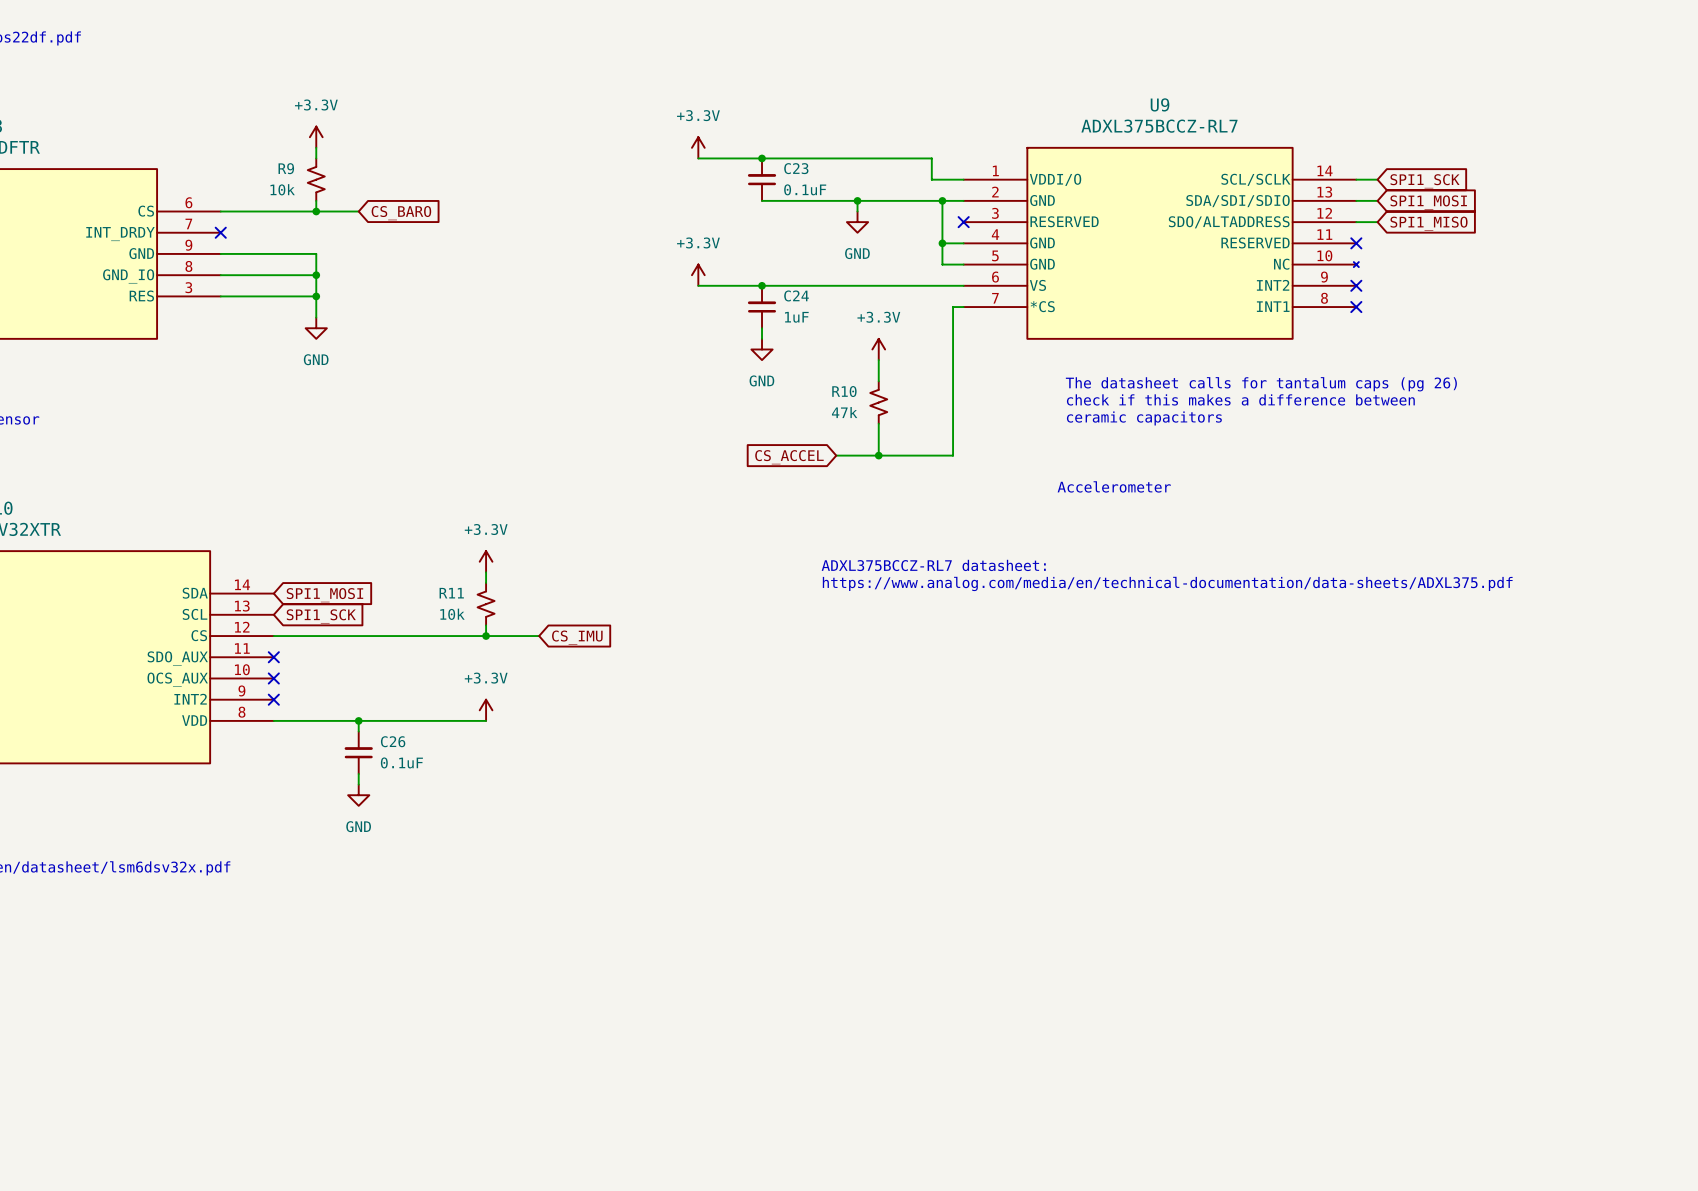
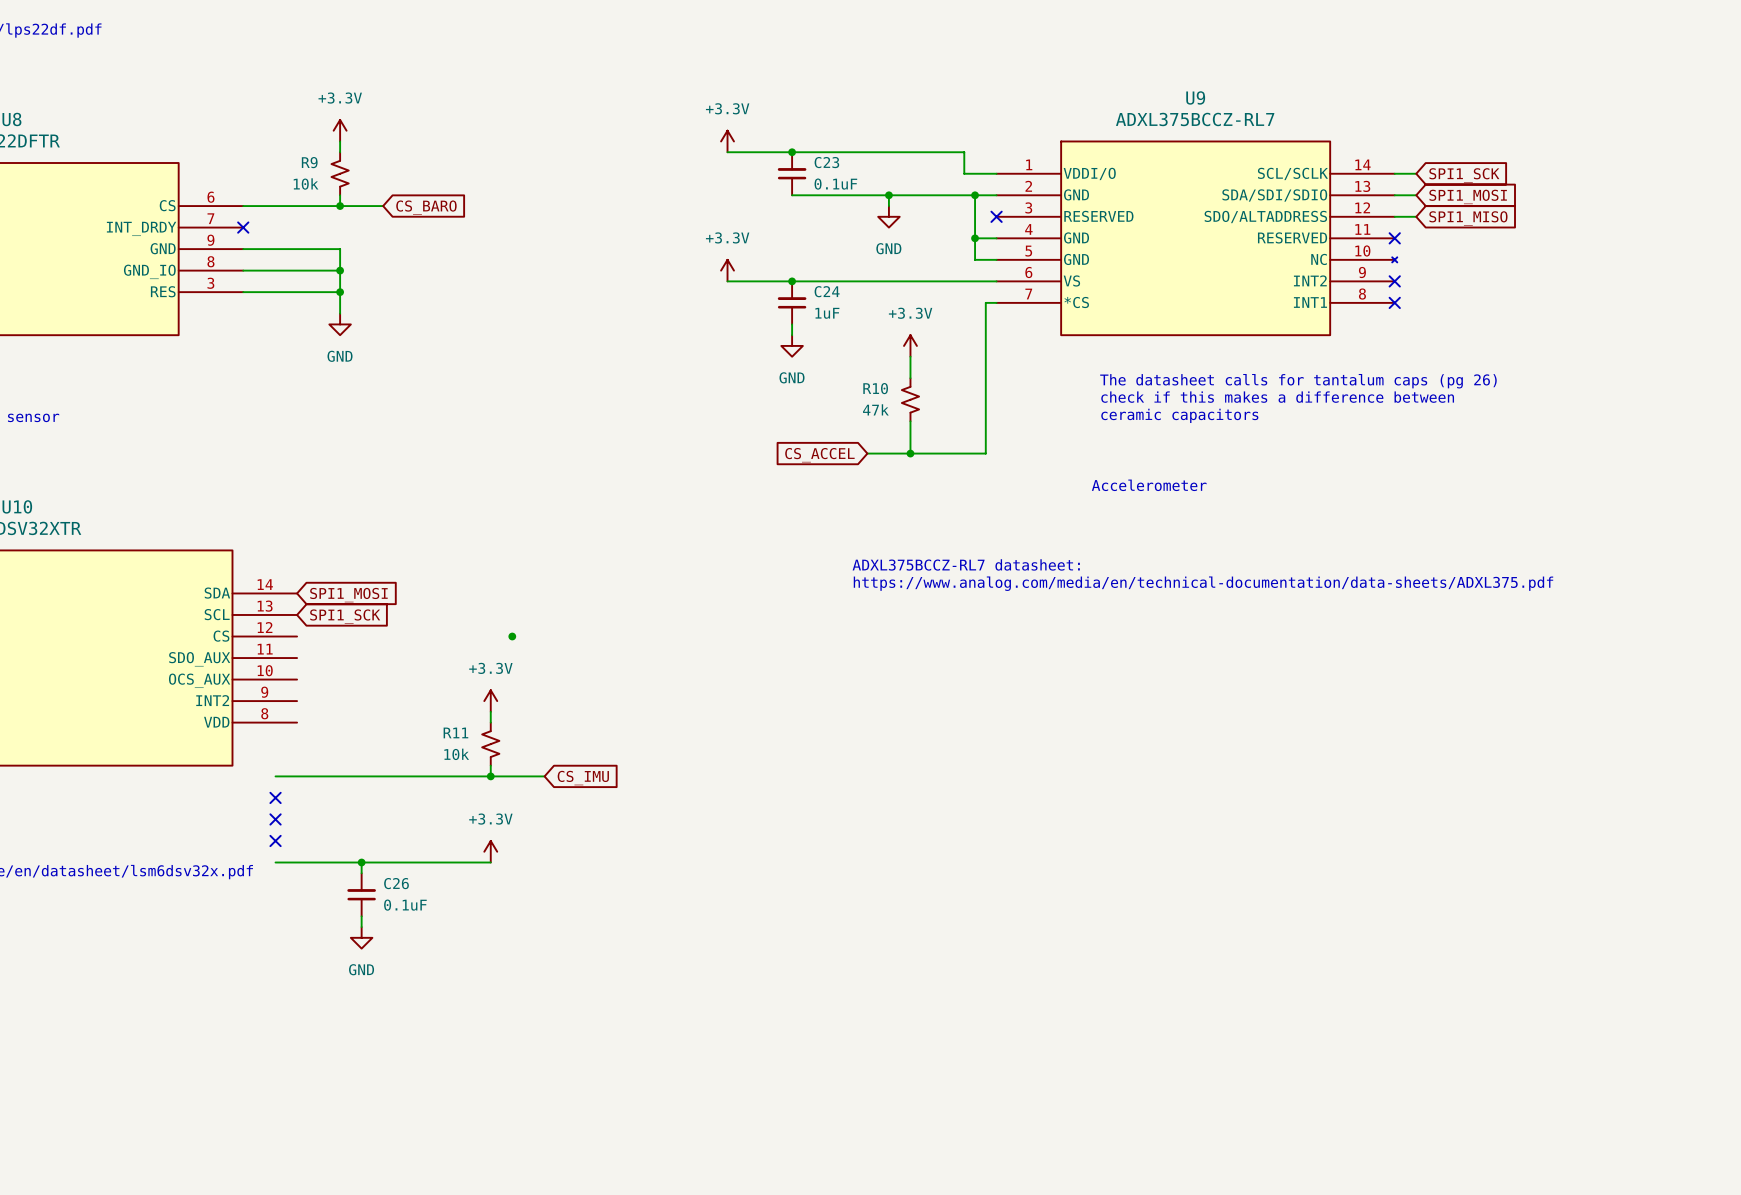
power symbol: +3.3V (486, 561) -> none
wire: (486, 572) (486, 582) -> (490, 711) (490, 722)
R11 position: (486, 604) -> (490, 744)
wire: (486, 625) (486, 636) -> (490, 765) (490, 776)
wire: (273, 636) (539, 636) -> (275, 776) (544, 776)
global label position: CS_IMU (577, 637) -> CS_IMU (583, 778)
no-connect mark: (273, 657) -> none
no-connect mark: (273, 678) -> none
no-connect mark: (273, 699) -> none
power symbol position: +3.3V (486, 710) -> +3.3V (490, 701)
wire: (273, 720) (486, 720) -> (275, 862) (490, 862)
wire: (358, 720) (358, 731) -> (361, 862) (361, 873)
junction: (358, 720) -> none
C26 position: (358, 752) -> (361, 894)
wire: (358, 773) (358, 784) -> (361, 916) (361, 927)
junction: none -> (490, 776)
no-connect mark: none -> (275, 797)
power symbol position: GND (358, 795) -> GND (361, 937)
no-connect mark: none -> (275, 819)
no-connect mark: none -> (275, 840)
power symbol: none -> +3.3V (490, 851)
junction: none -> (361, 862)

